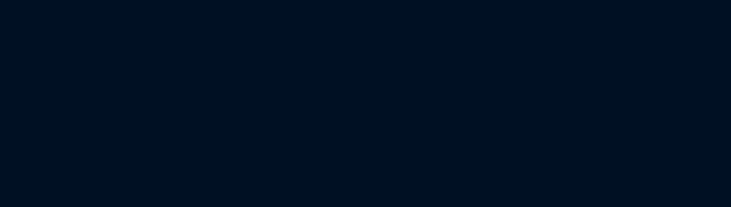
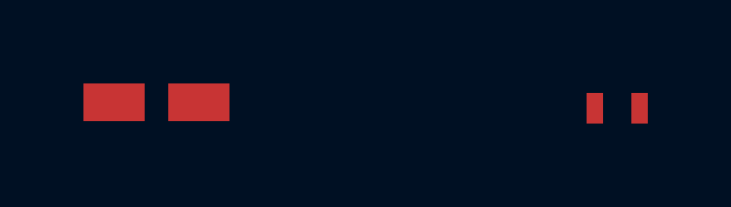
part: none -> (156, 102)
part: none -> (617, 108)

